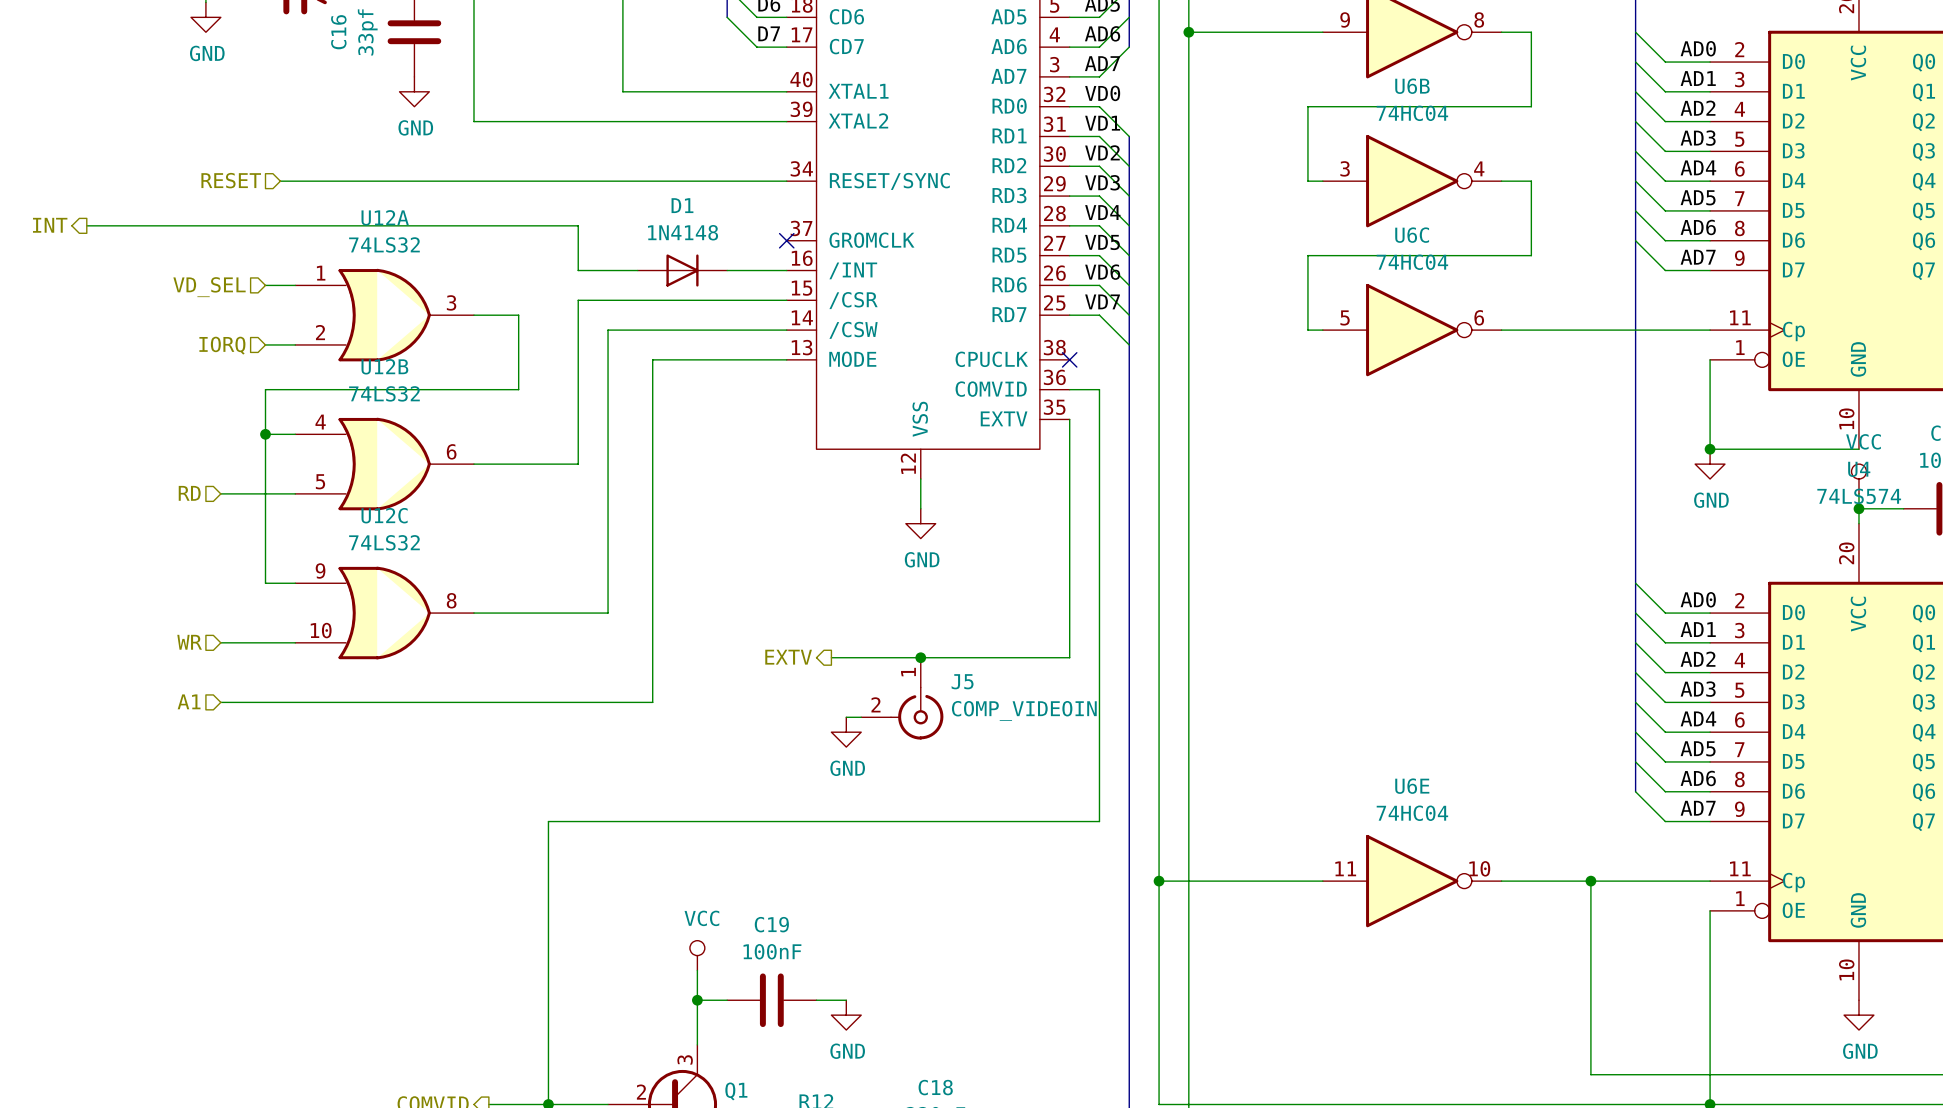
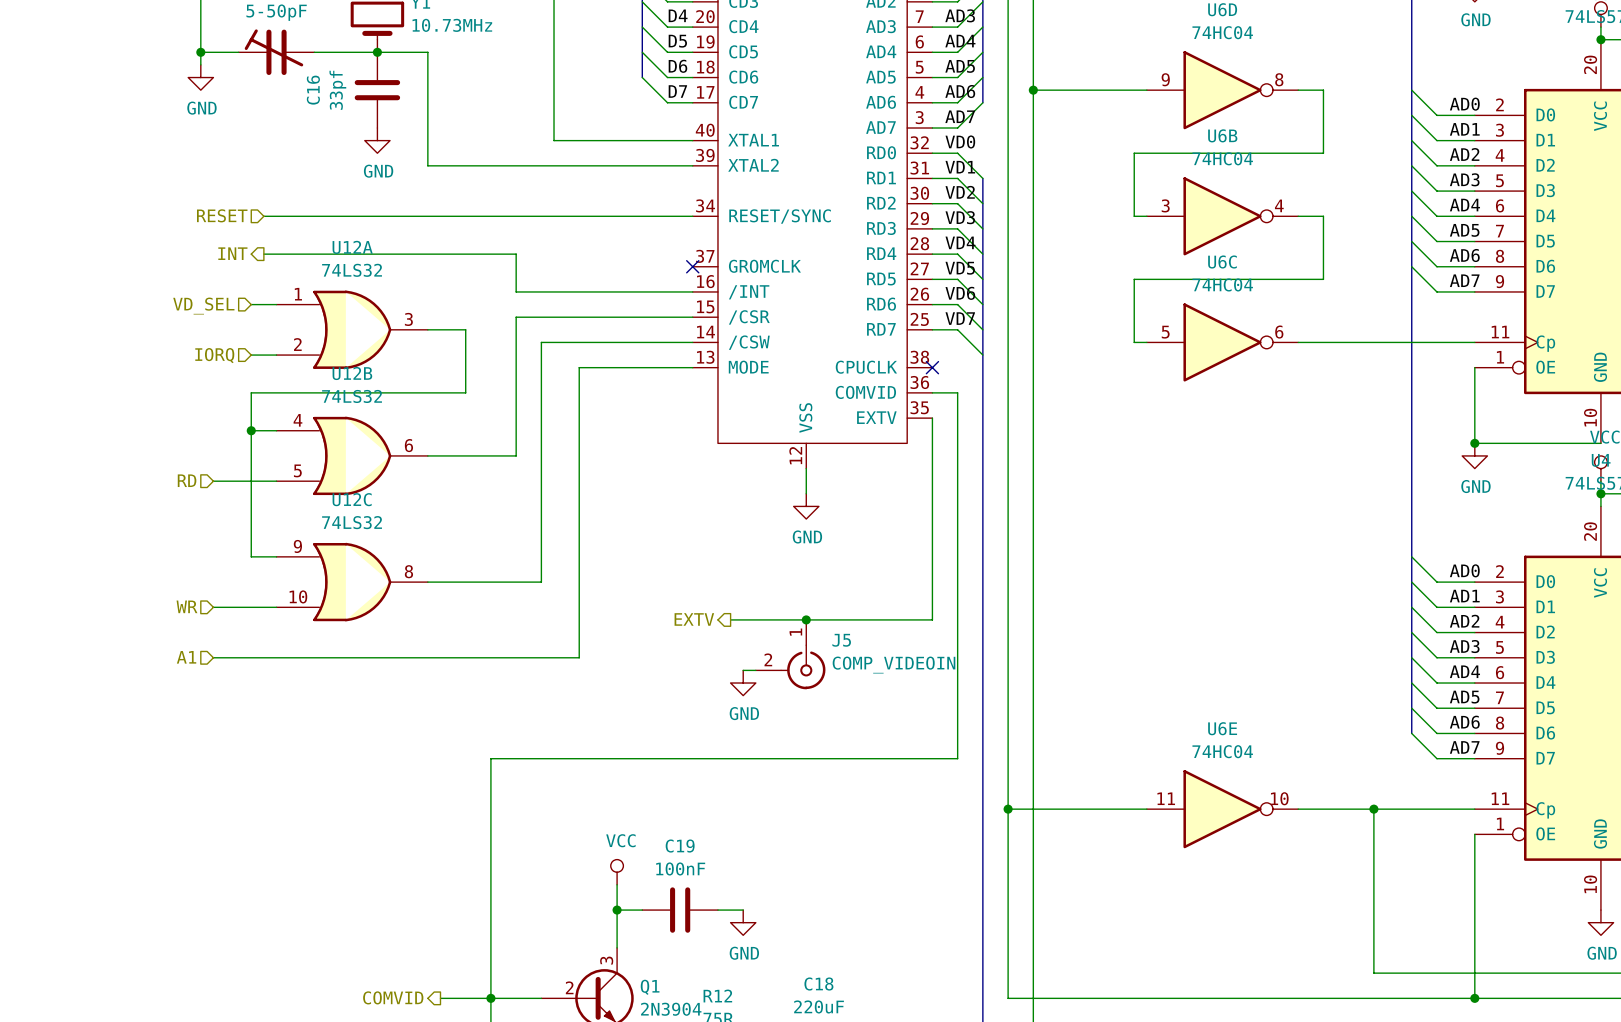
hierarchical label position: INT (50, 225) -> INT (232, 253)
wire: (86, 225) (280, 225) -> none
D1: 1N4148 (682, 270) -> none

